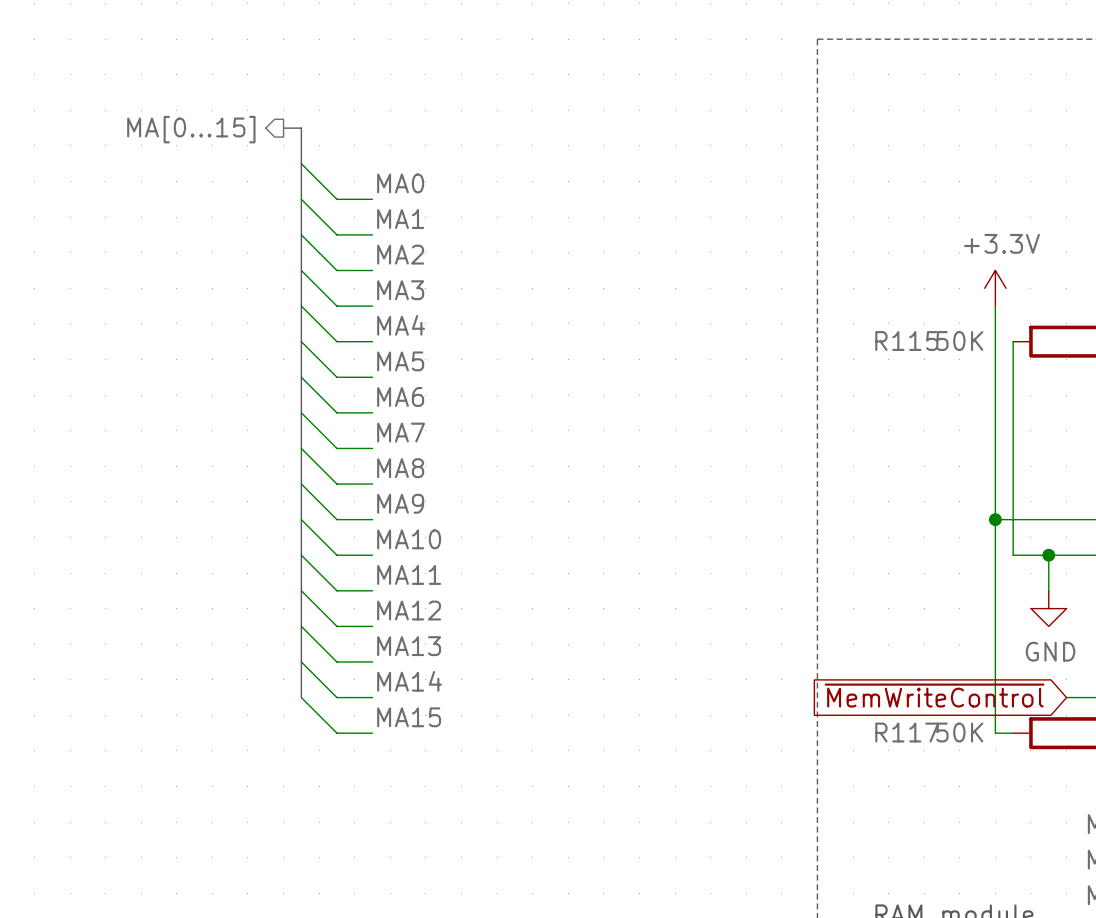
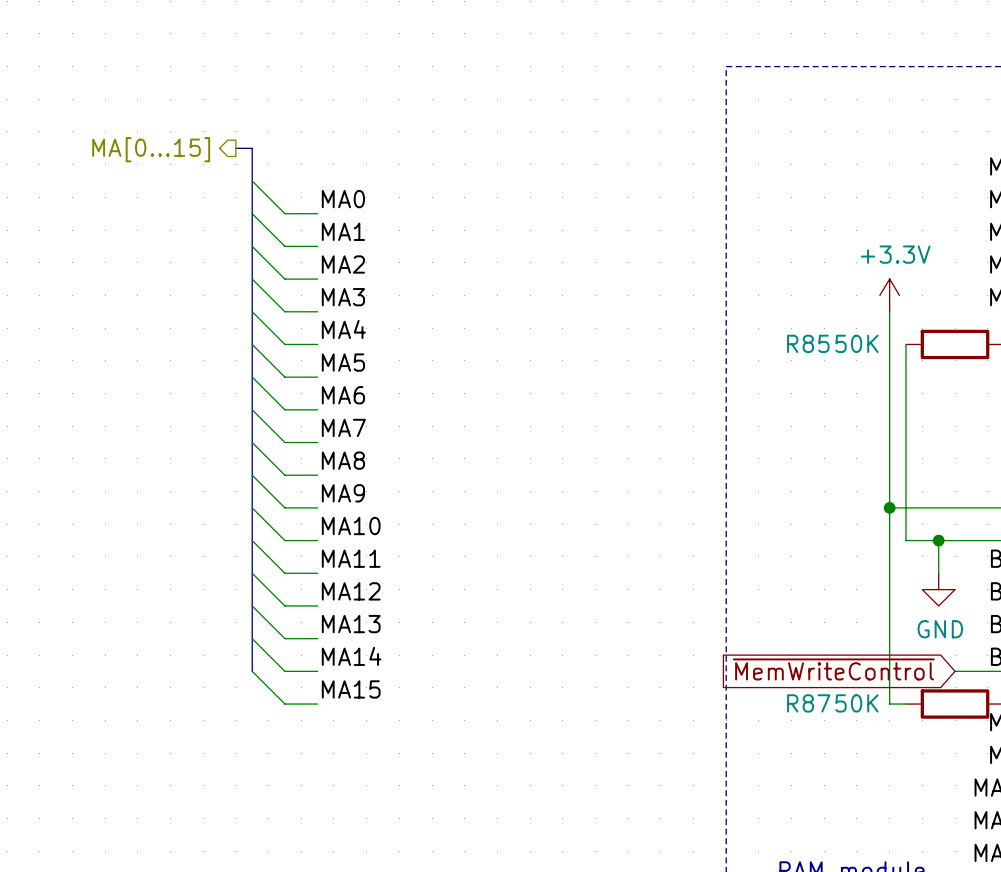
R115 name: R115 (906, 341) -> R85 (808, 343)
R117 name: R117 (907, 732) -> R87 (808, 703)

